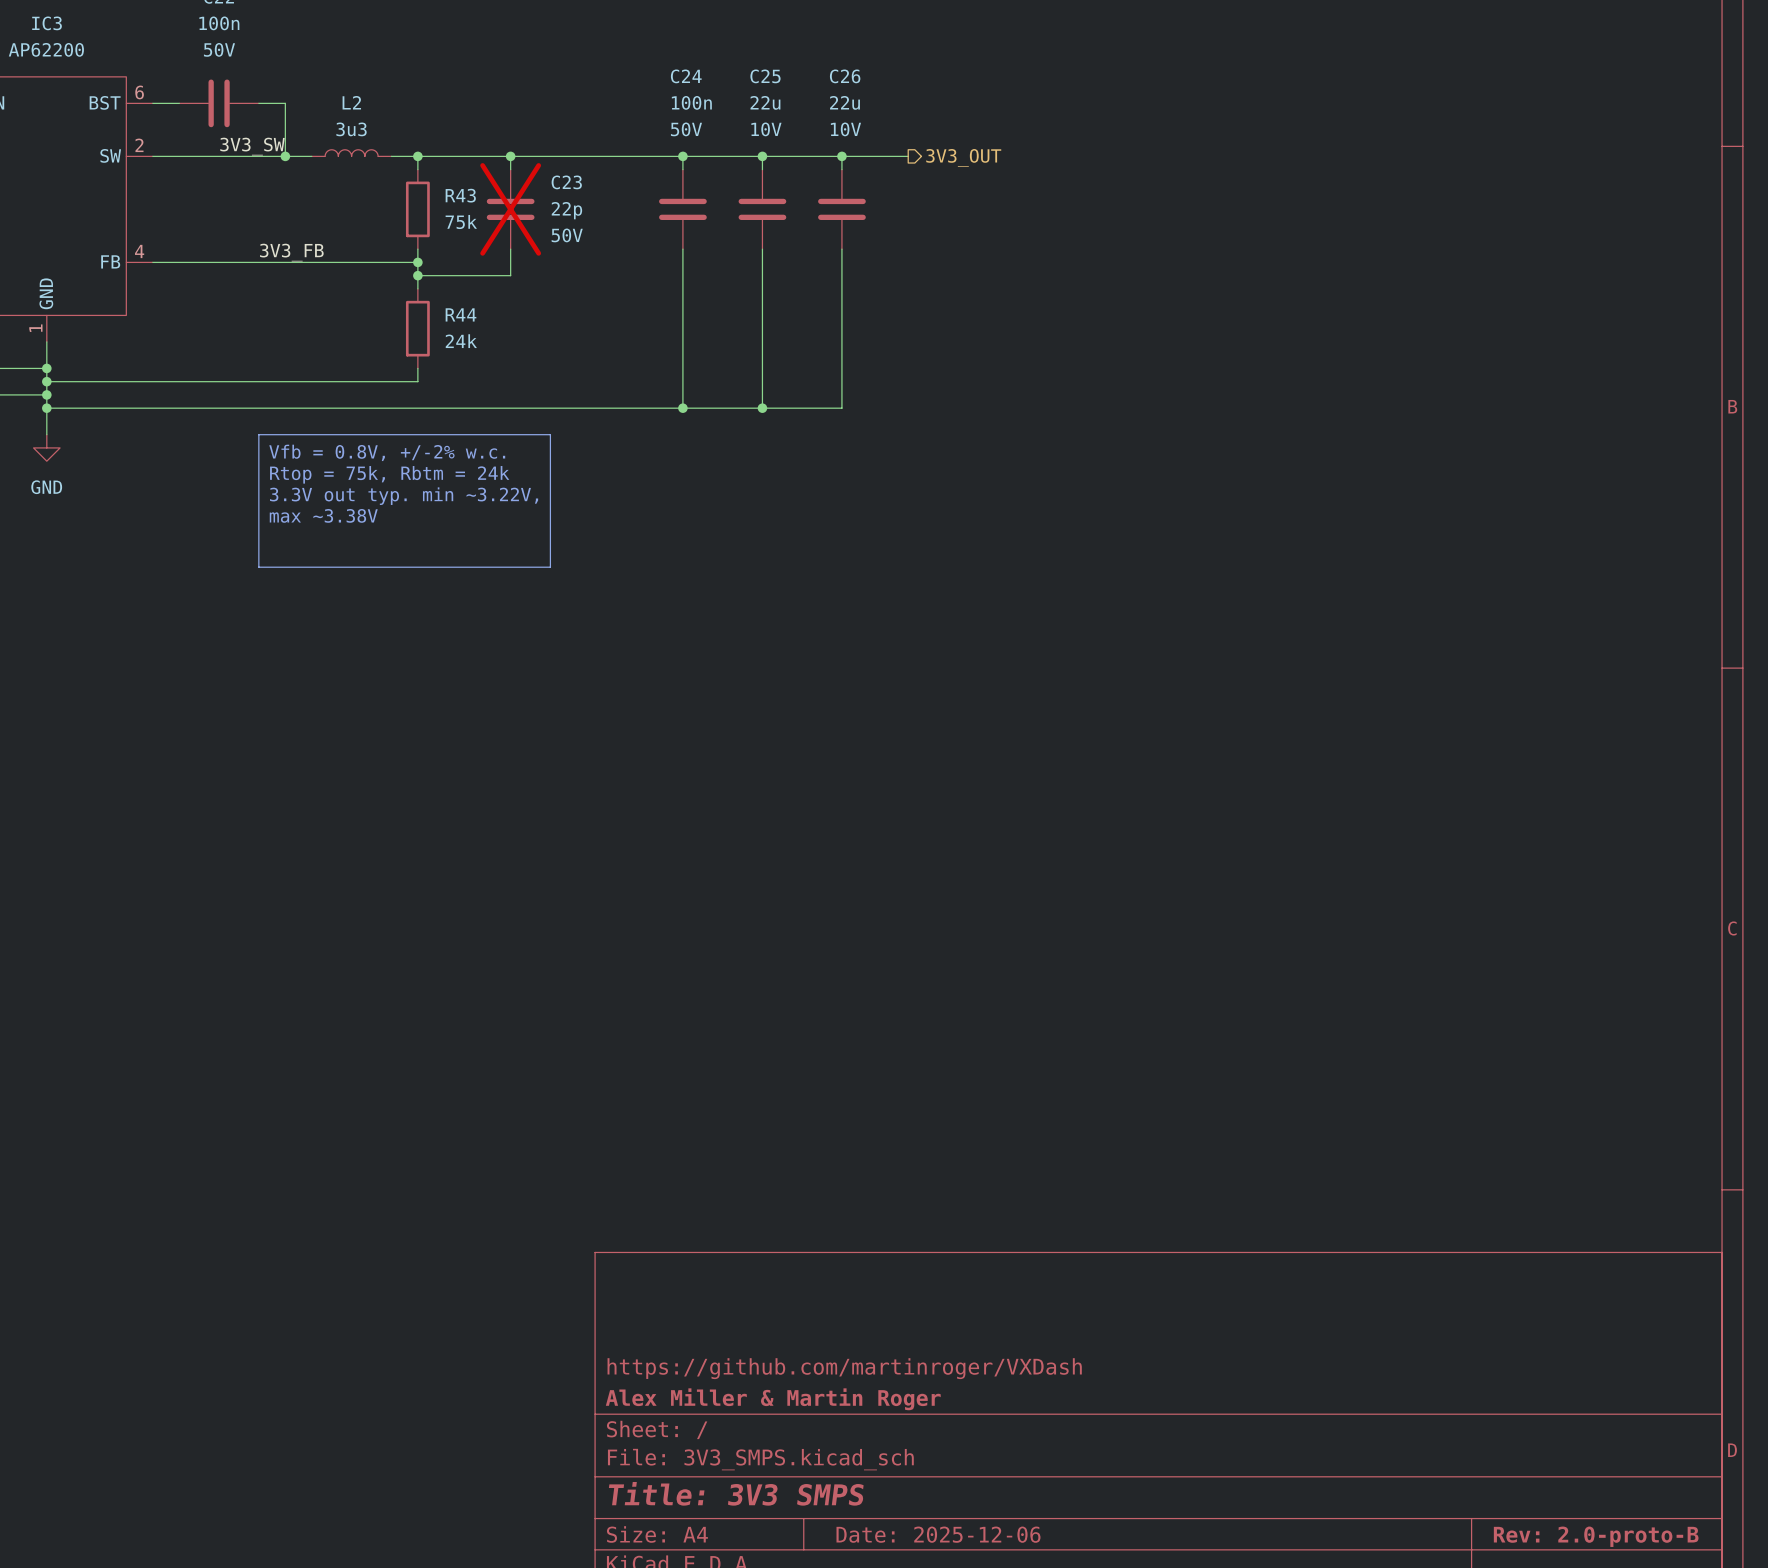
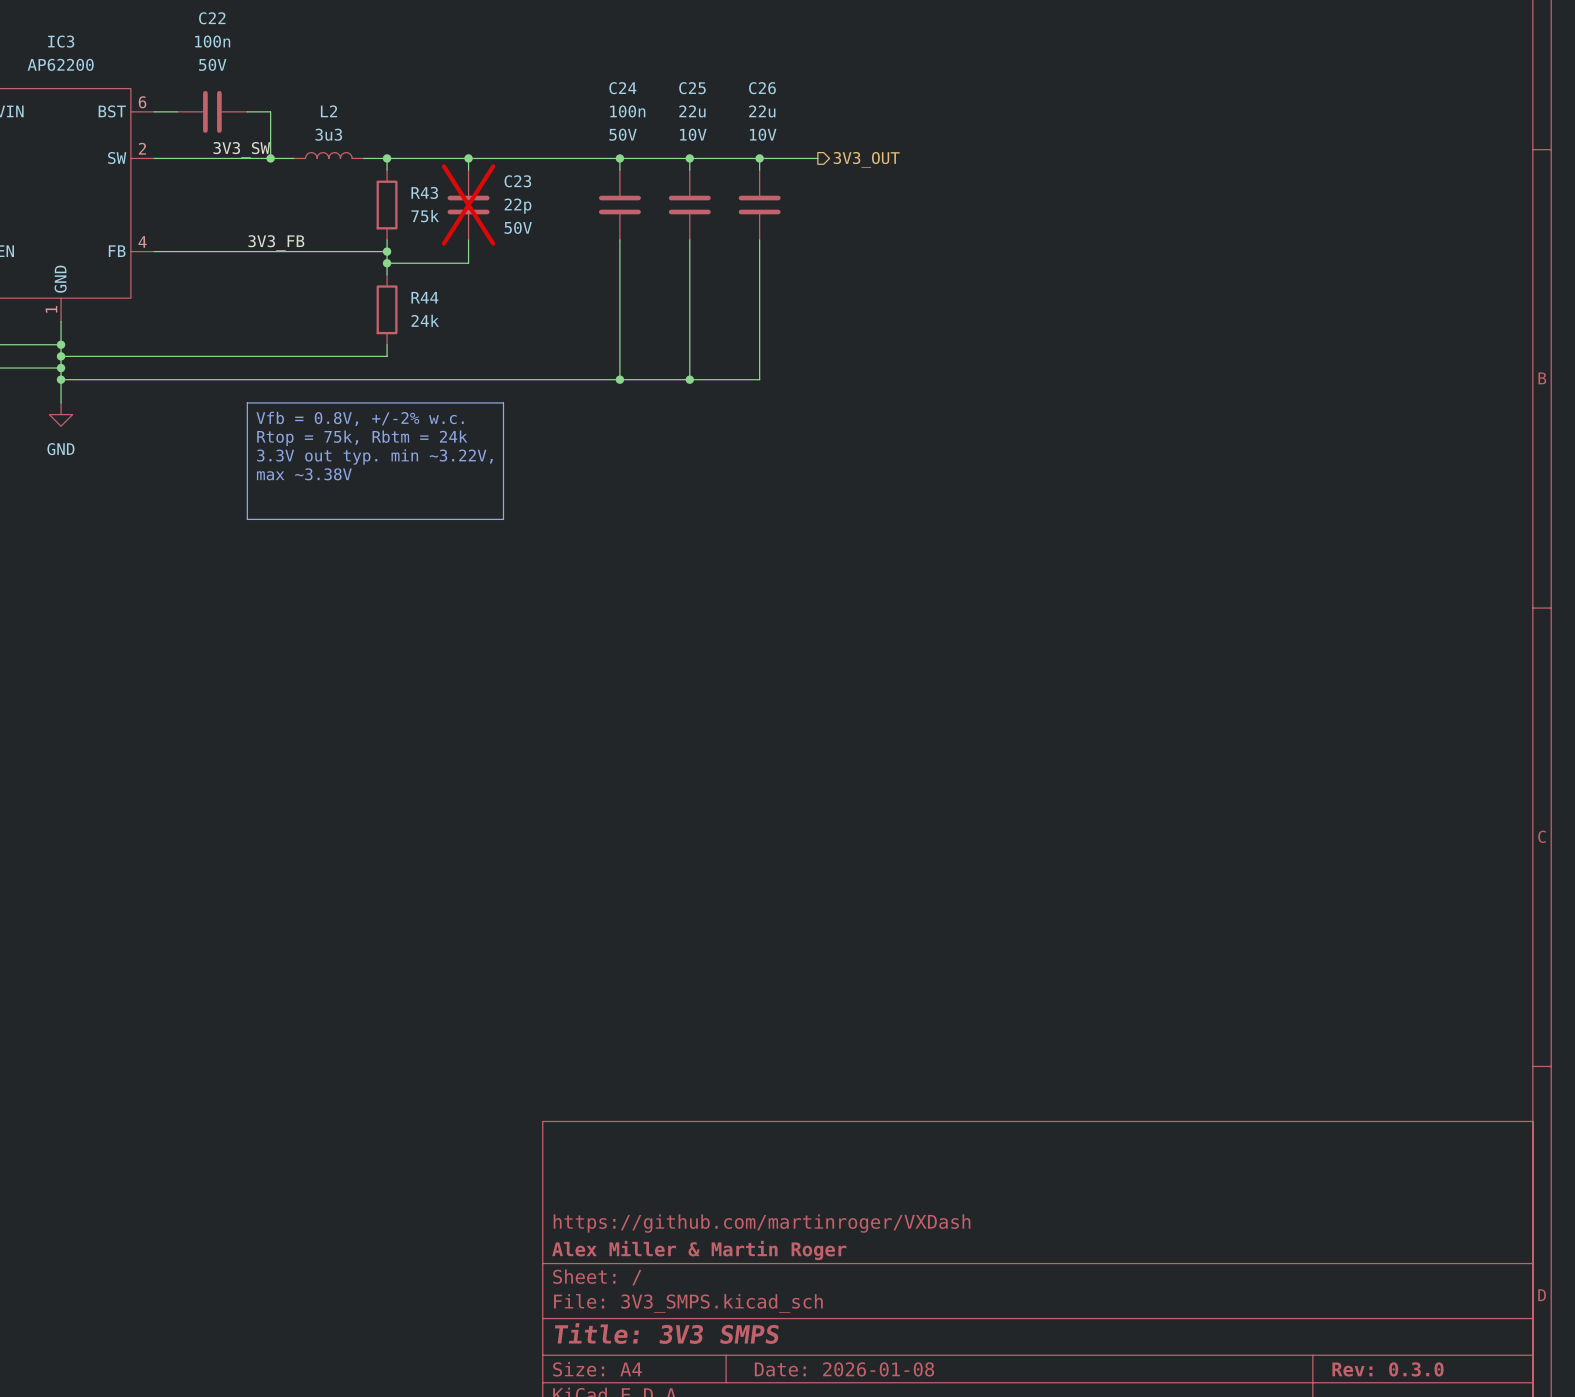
title block: Date: 2025-12-06 (938, 1534) -> Date: 2026-01-08 (844, 1369)
title block: Rev: 2.0-proto-B (1596, 1536) -> Rev: 0.3.0 (1388, 1369)

